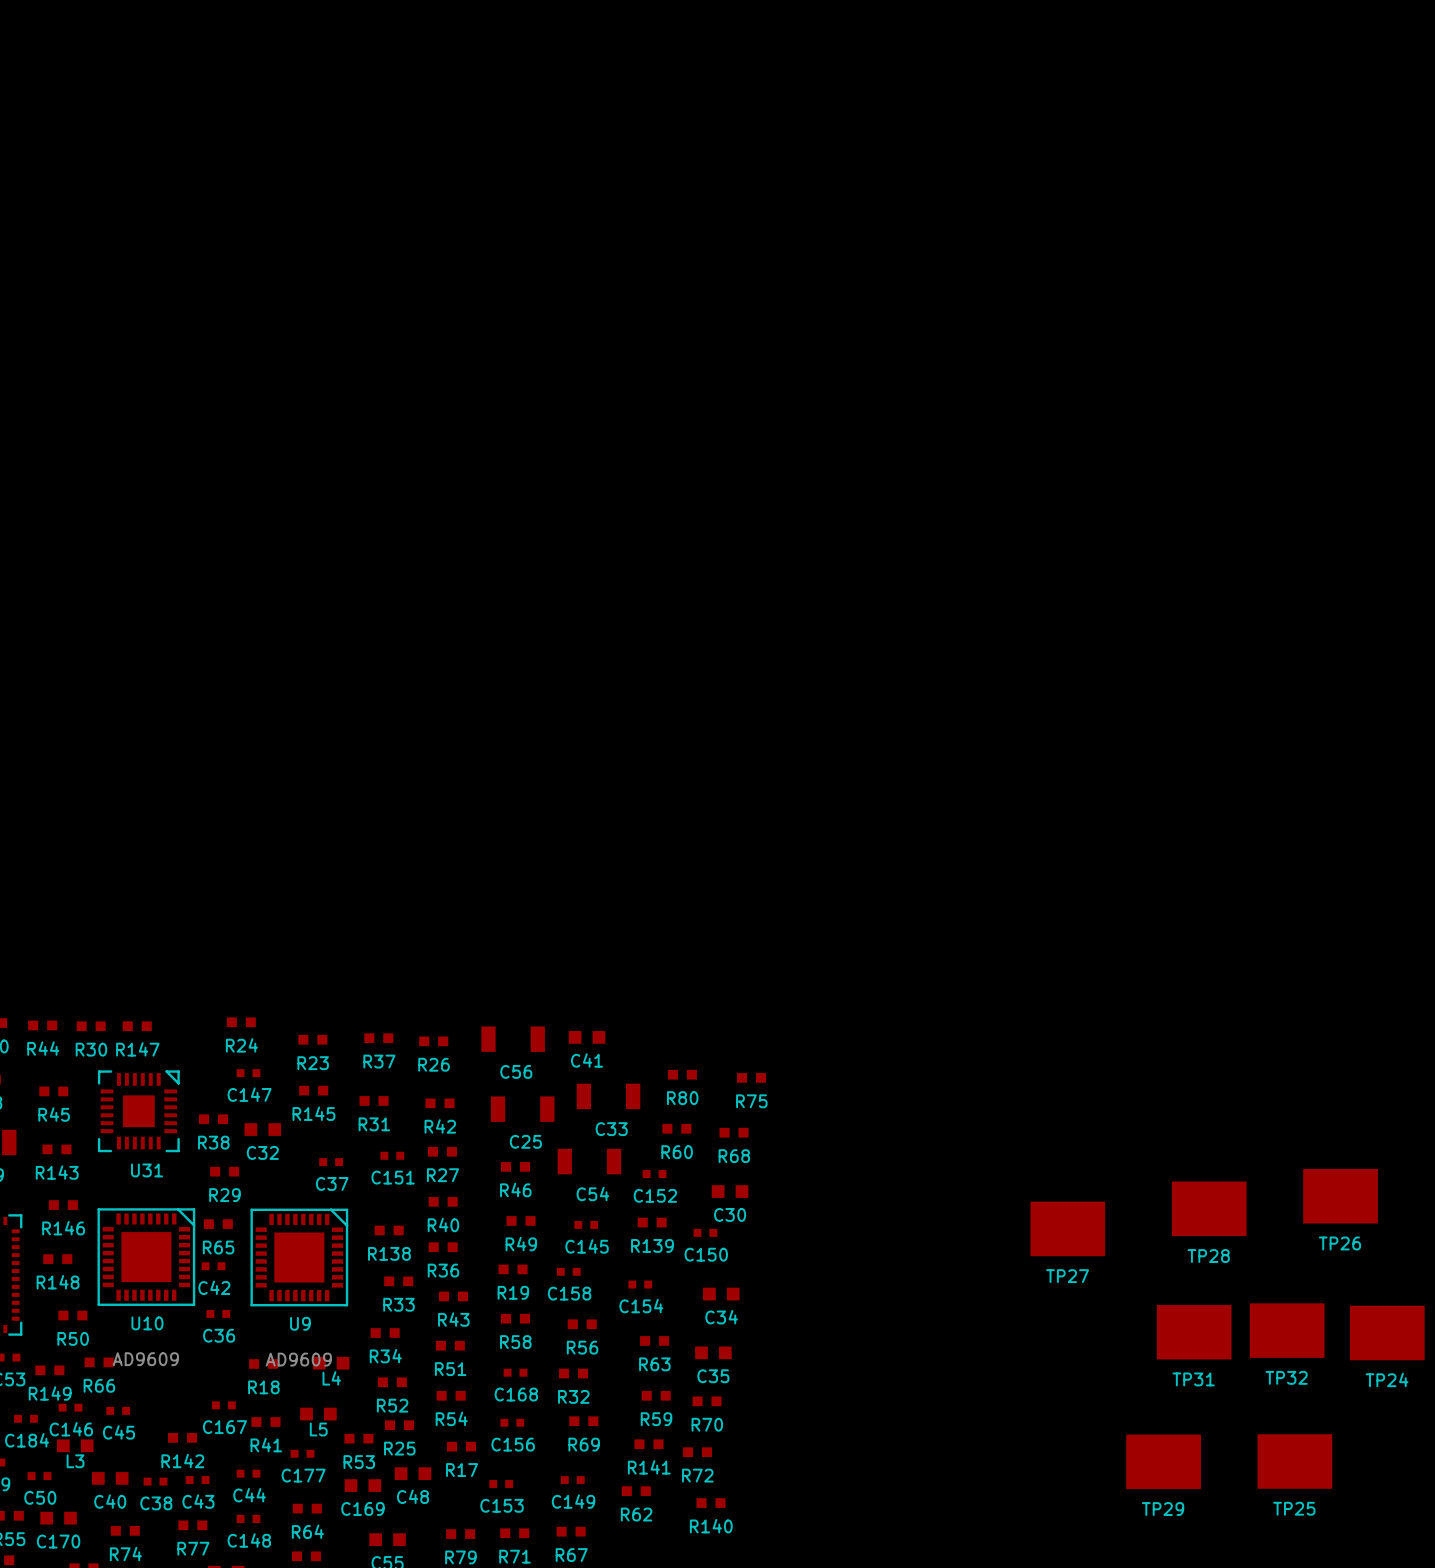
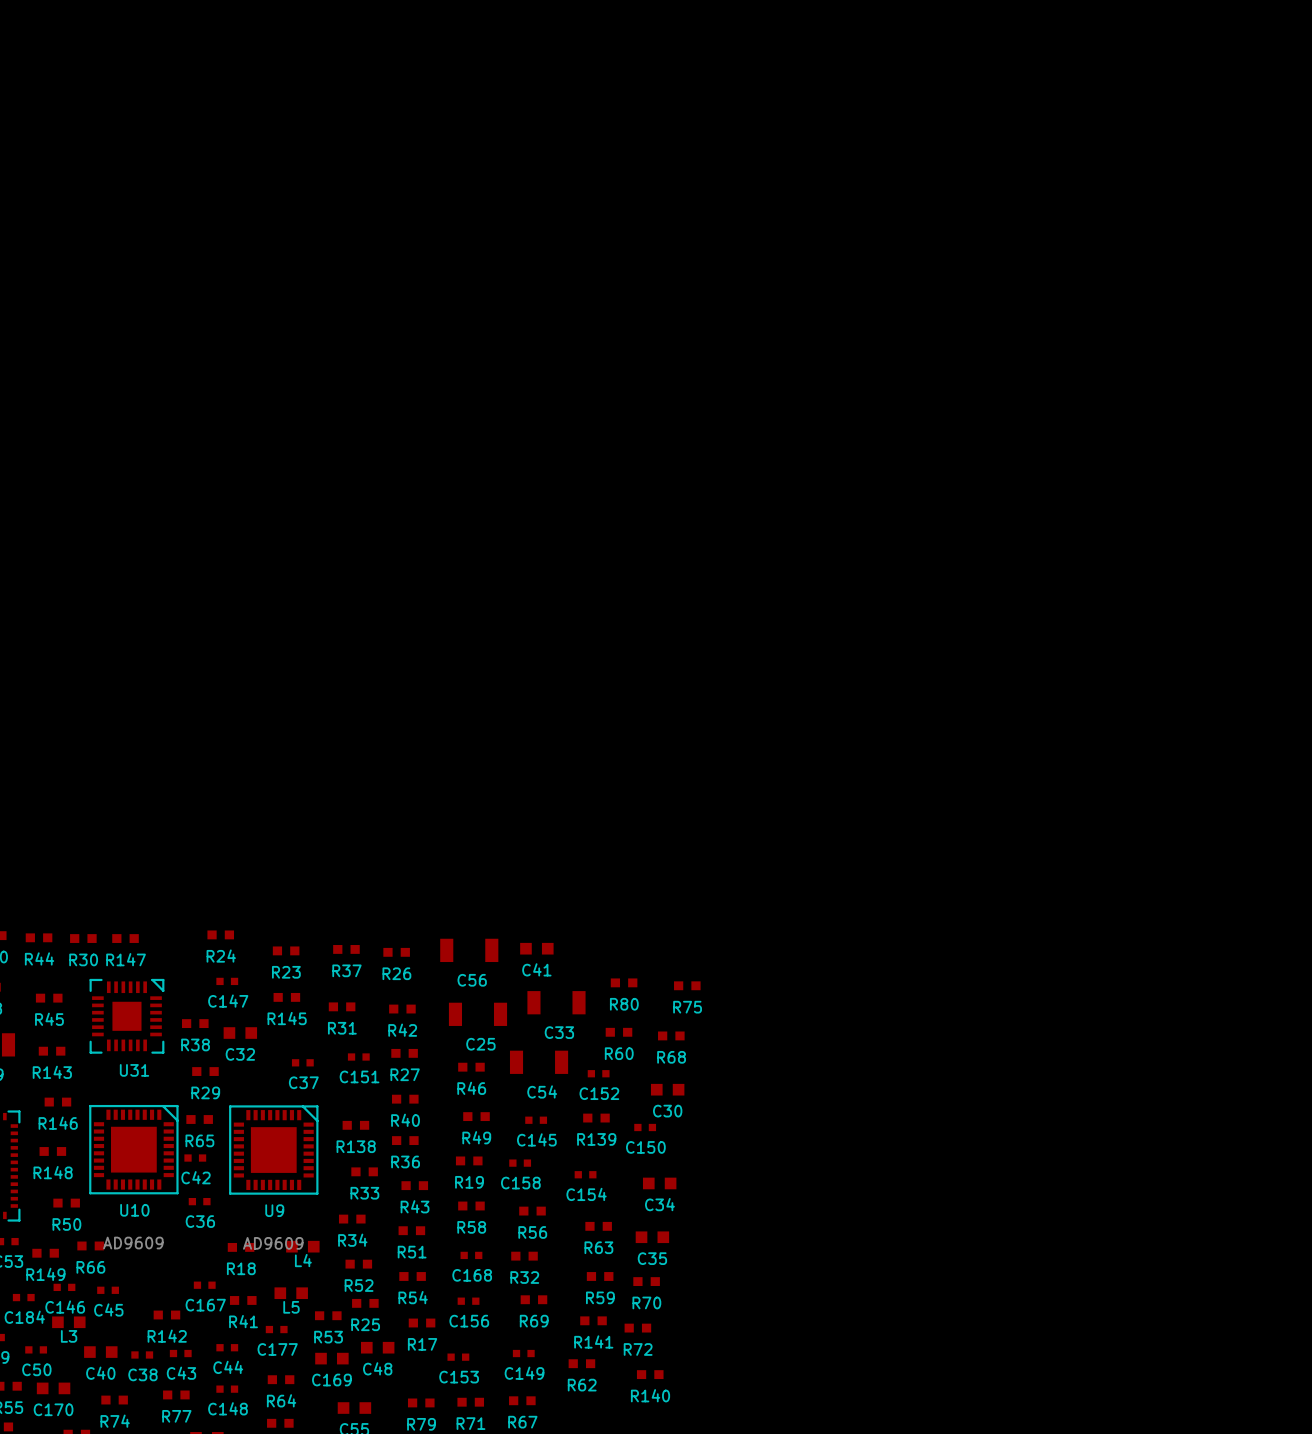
TP26: (1340, 1196) -> none
TP28: (1209, 1208) -> none
TP27: (1067, 1228) -> none
TP32: (1287, 1330) -> none
TP31: (1194, 1332) -> none
TP24: (1387, 1333) -> none
TP29: (1163, 1461) -> none
TP25: (1294, 1461) -> none

